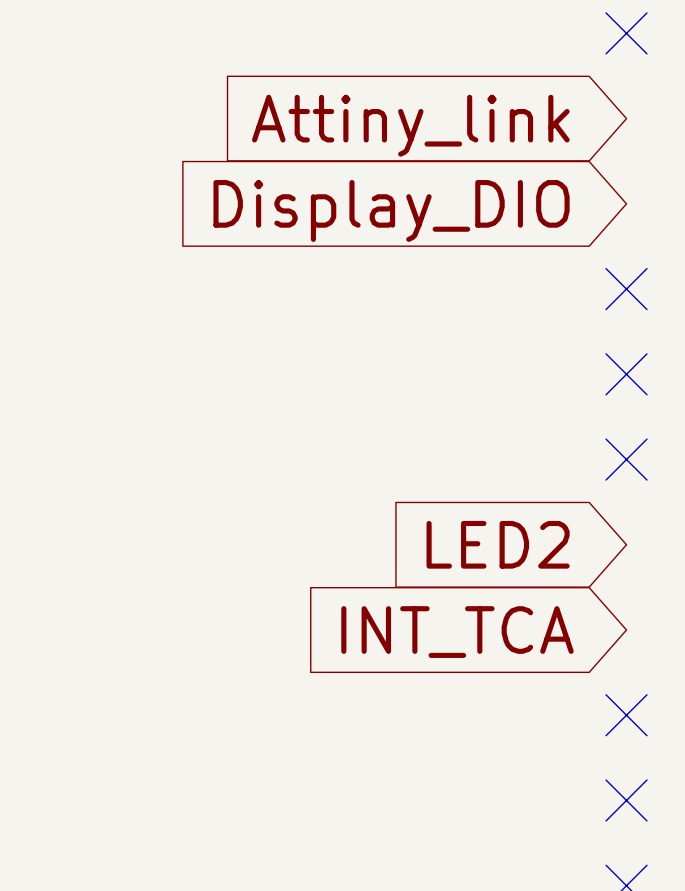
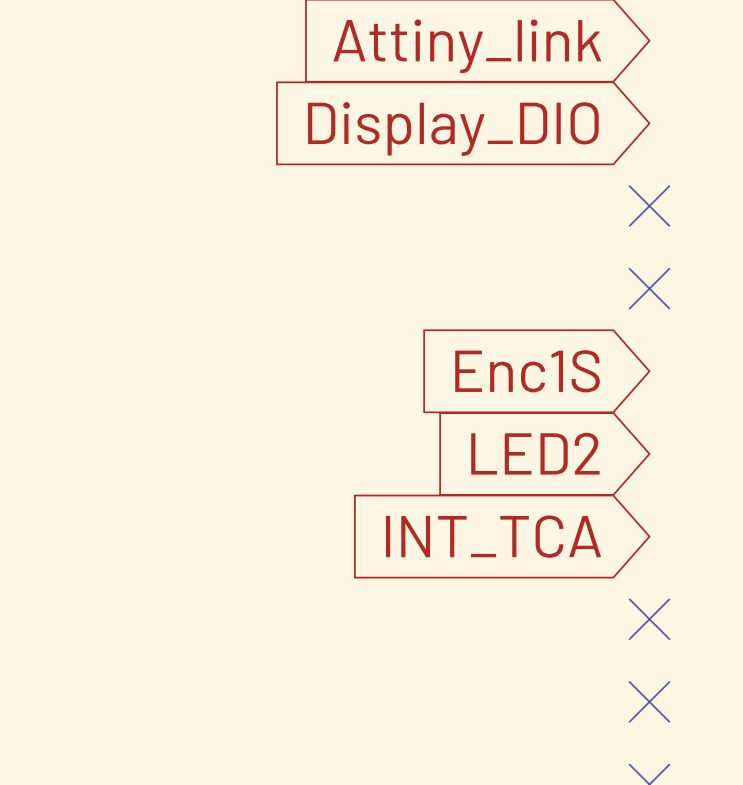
global label: none -> Enc1S (527, 371)
no-connect mark: (626, 459) -> none

